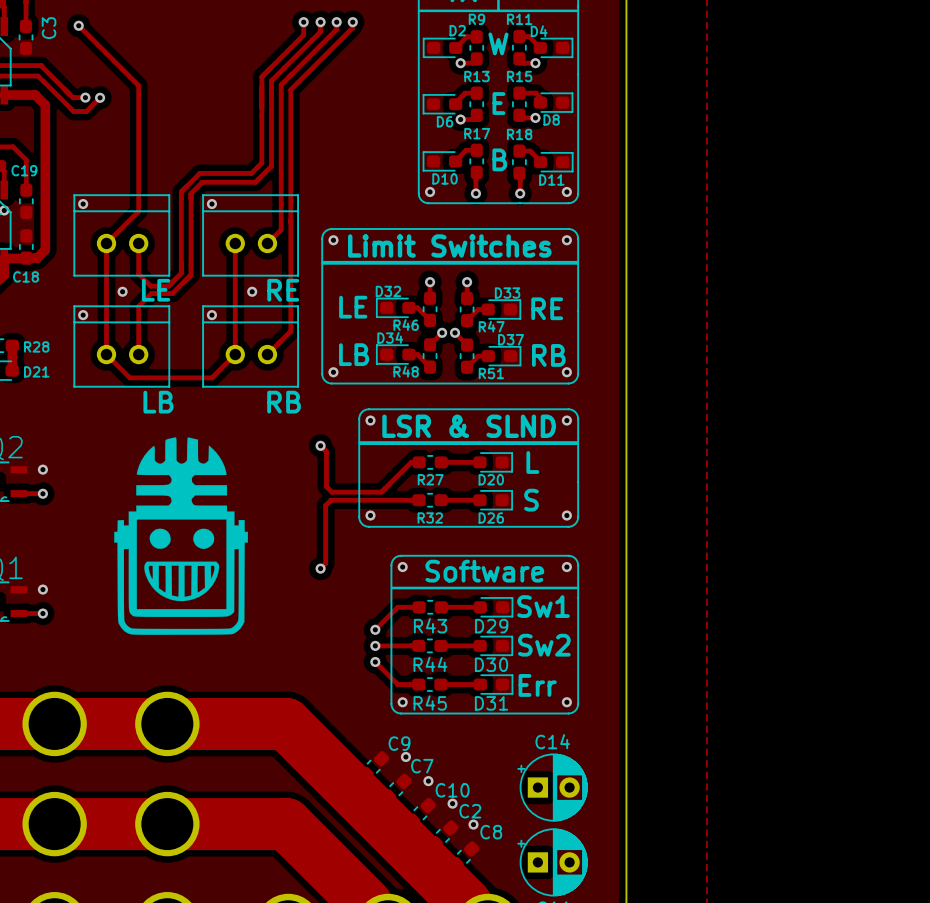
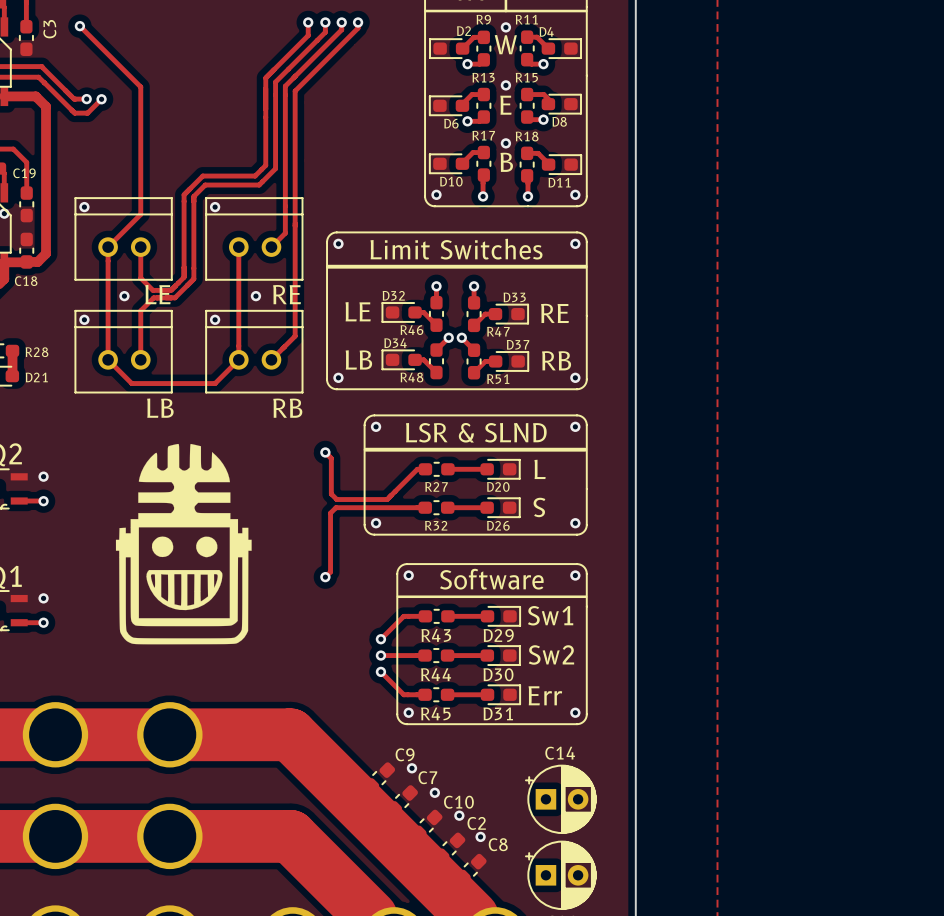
via: none -> (505, 27)
via: none -> (505, 85)
via: none -> (505, 143)

